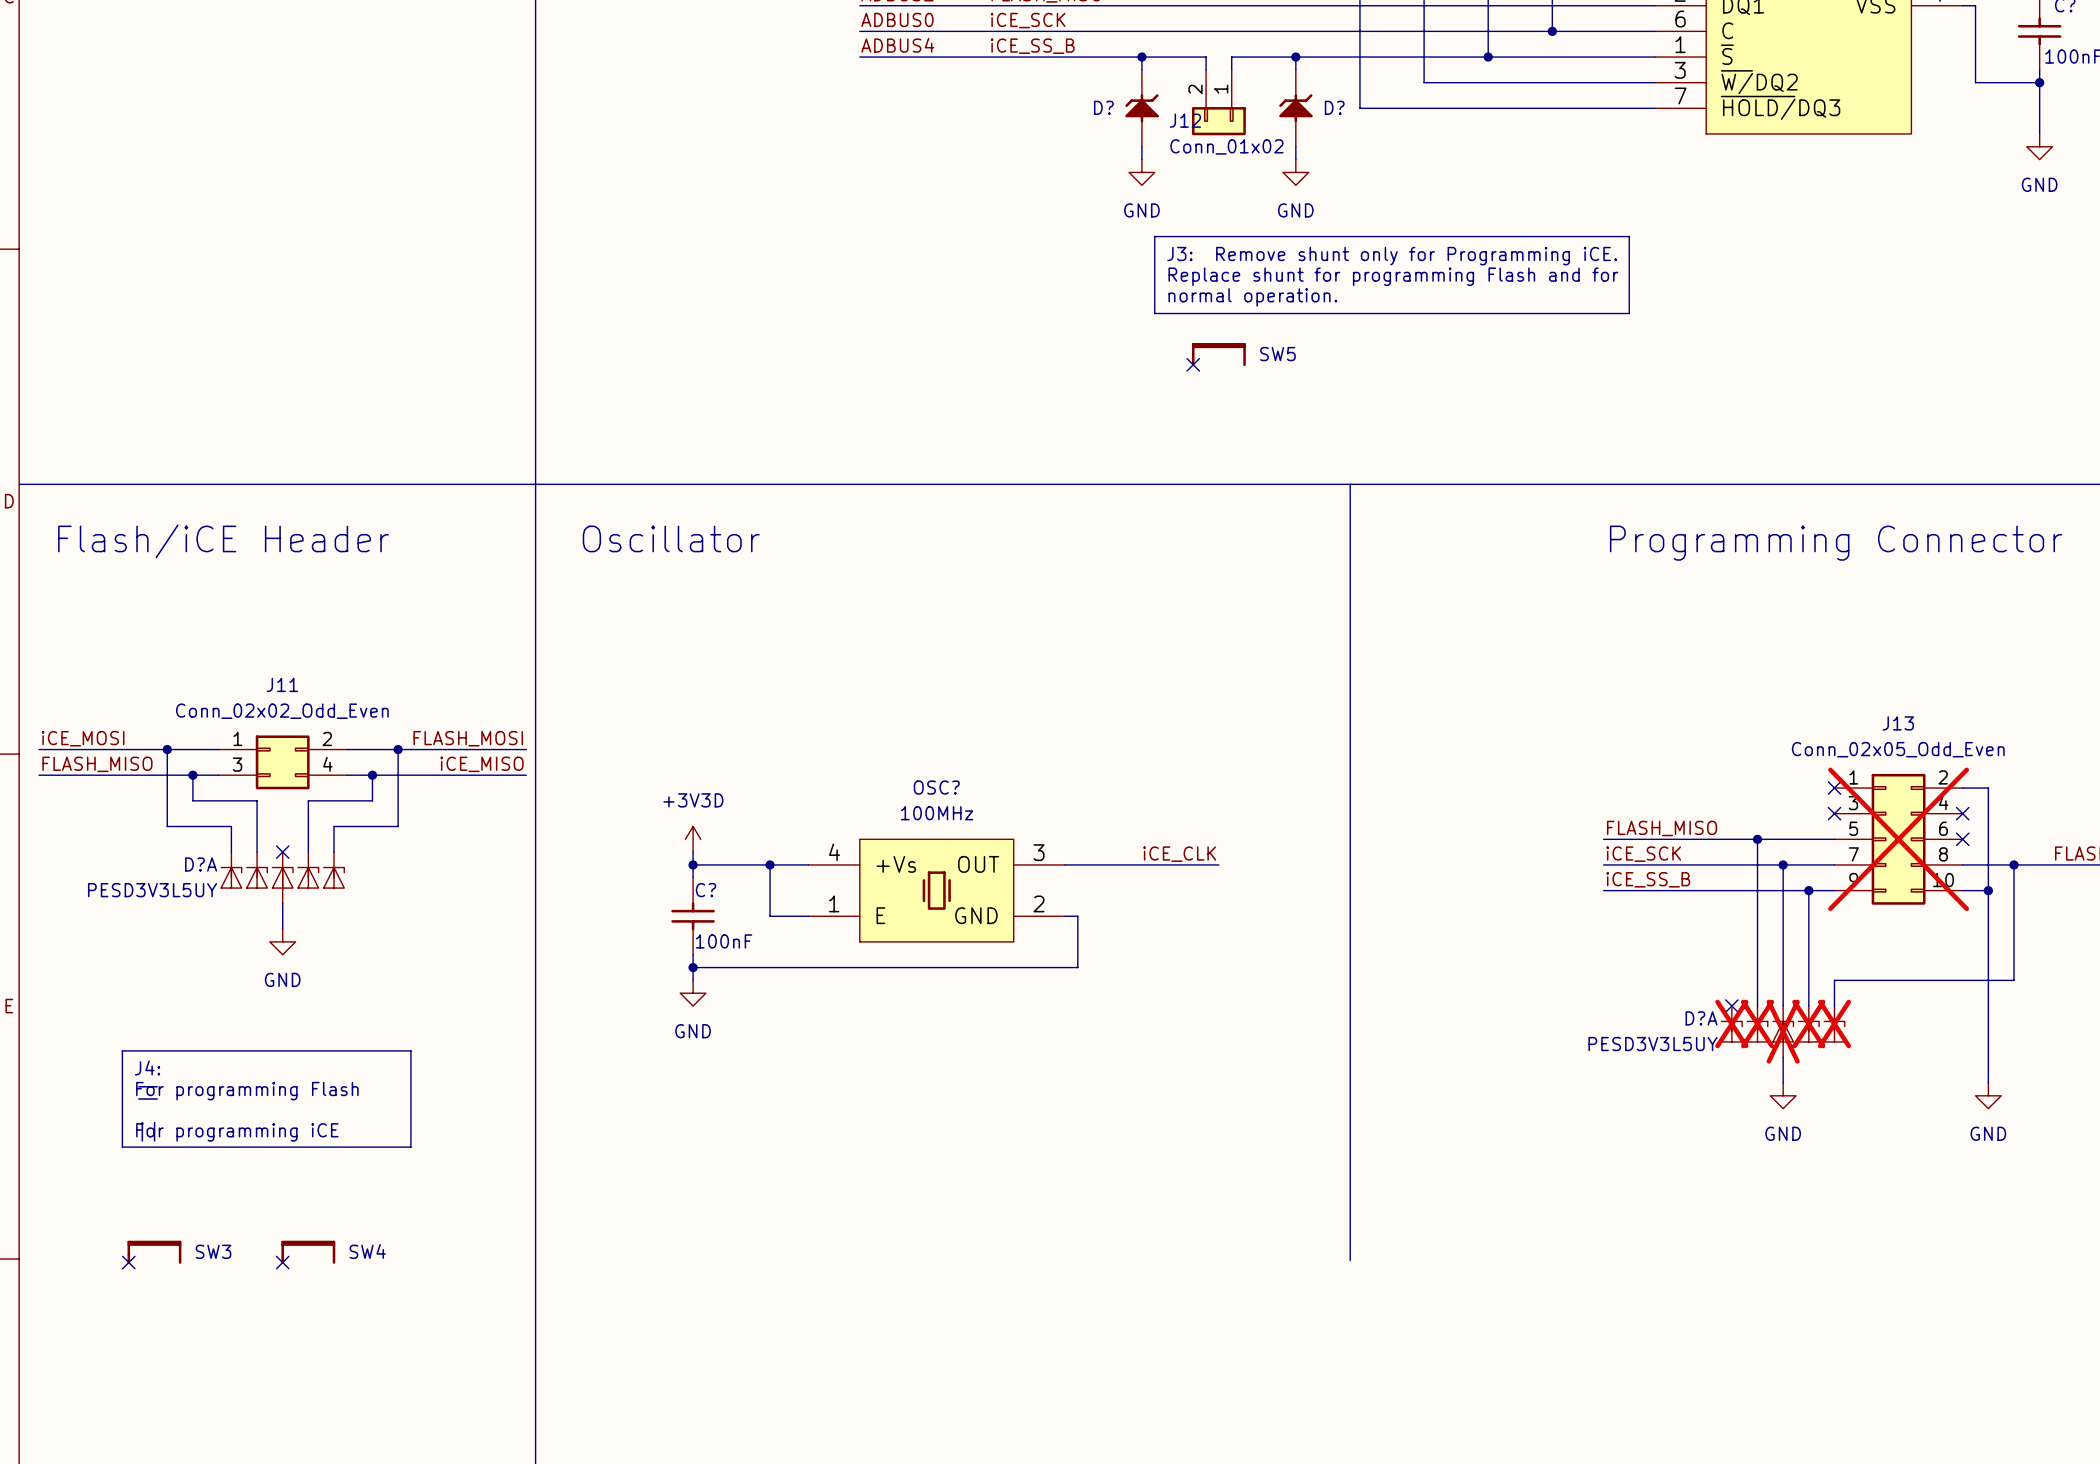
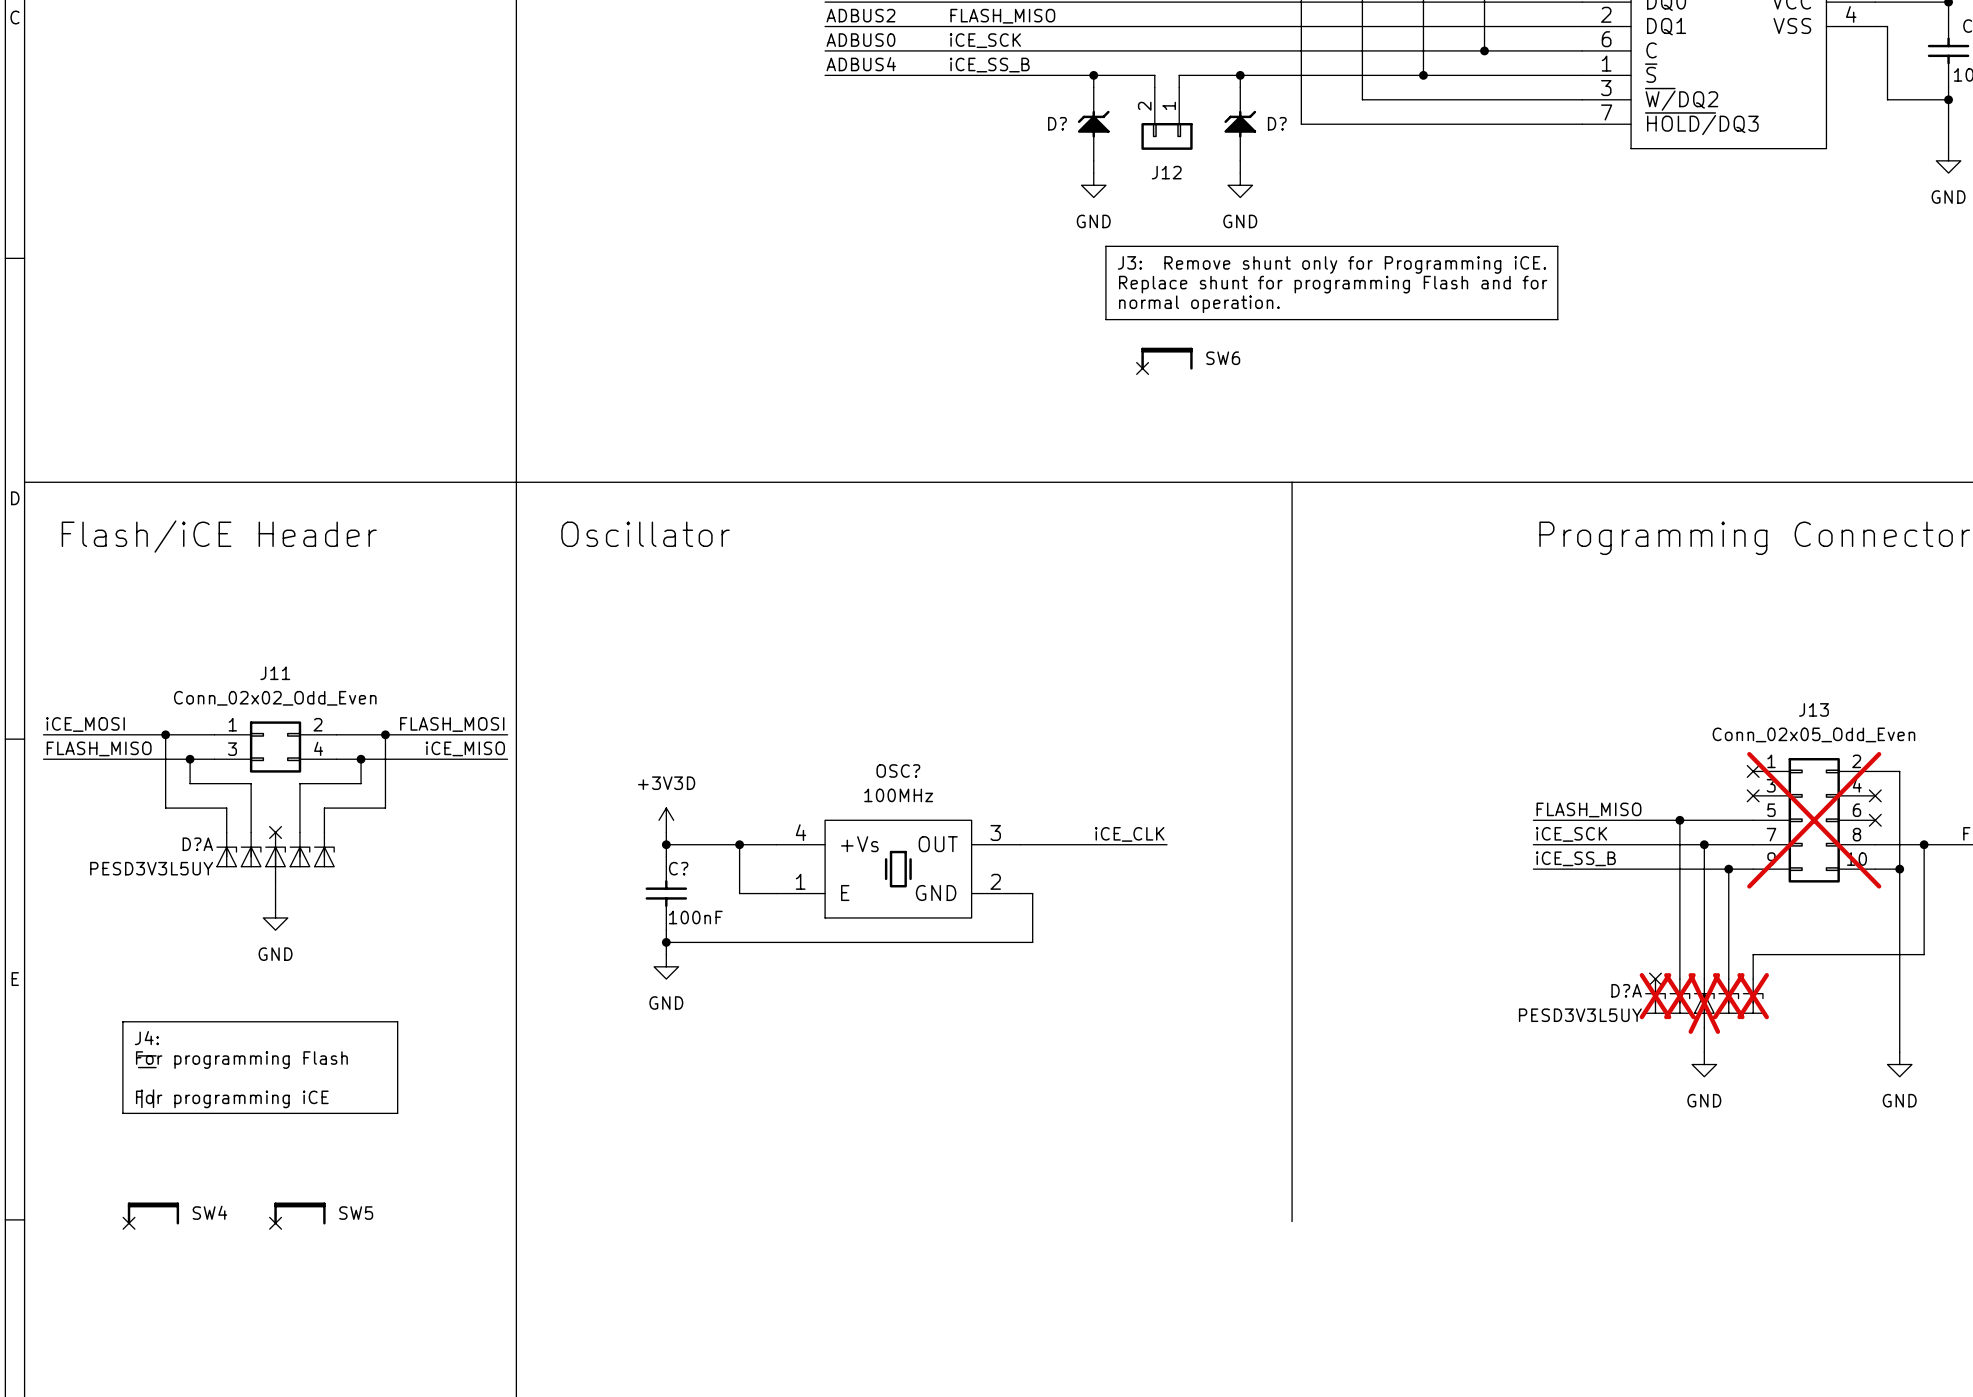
J12 name position: J12 (1185, 120) -> J12 (1166, 172)
J12 value: Conn_01x02 (1226, 146) -> none
SW5 name: SW5 (1277, 354) -> SW6 (1223, 358)
SW3 name: SW3 (213, 1251) -> SW4 (209, 1212)
SW4 name: SW4 (367, 1251) -> SW5 (356, 1213)

